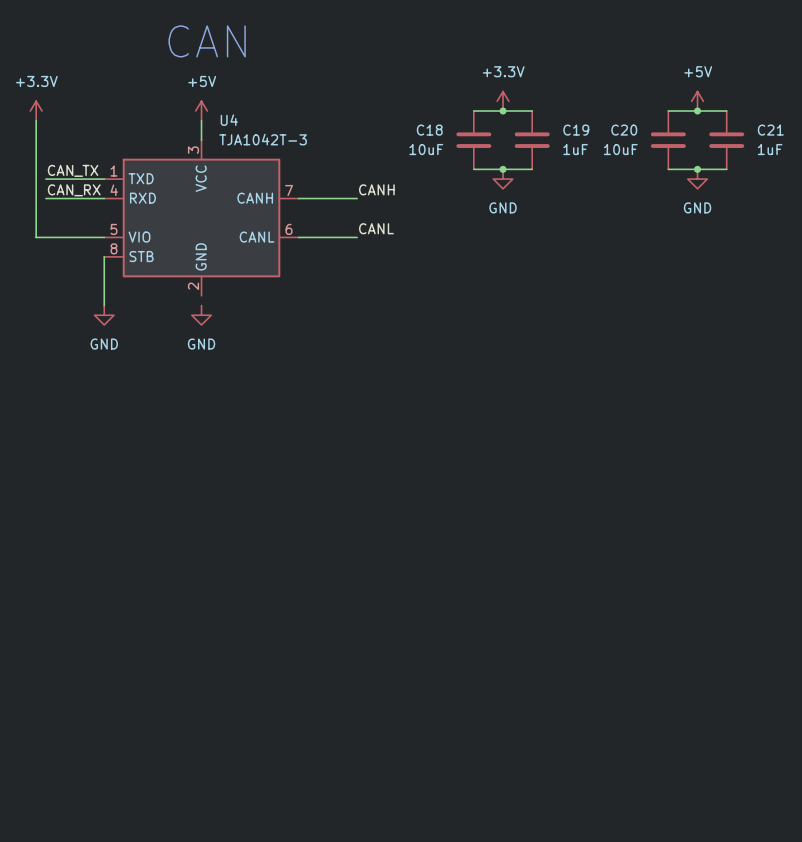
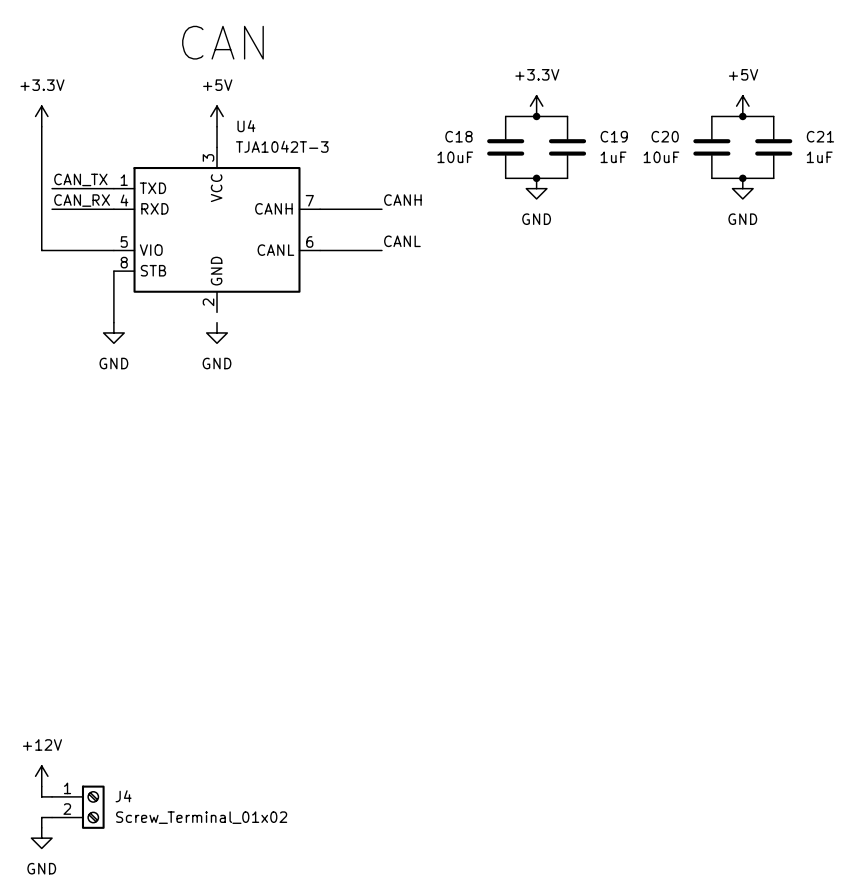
power symbol: none -> +12V (41, 776)
wire: none -> (41, 786) (41, 796) (52, 796)
J4: none -> Screw_Terminal_01x02 (78, 807)
wire: none -> (52, 817) (41, 817) (41, 827)
power symbol: none -> GND (41, 838)

